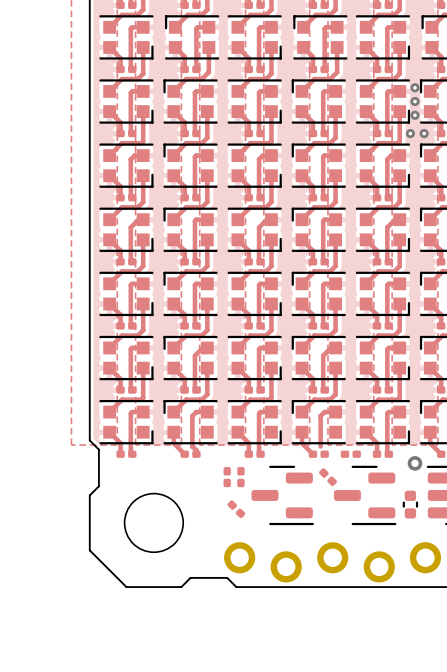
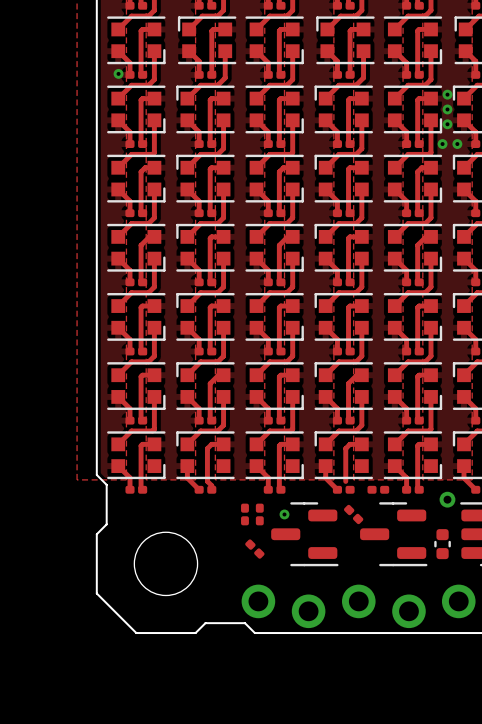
via: none -> (118, 73)
via: none -> (284, 514)

